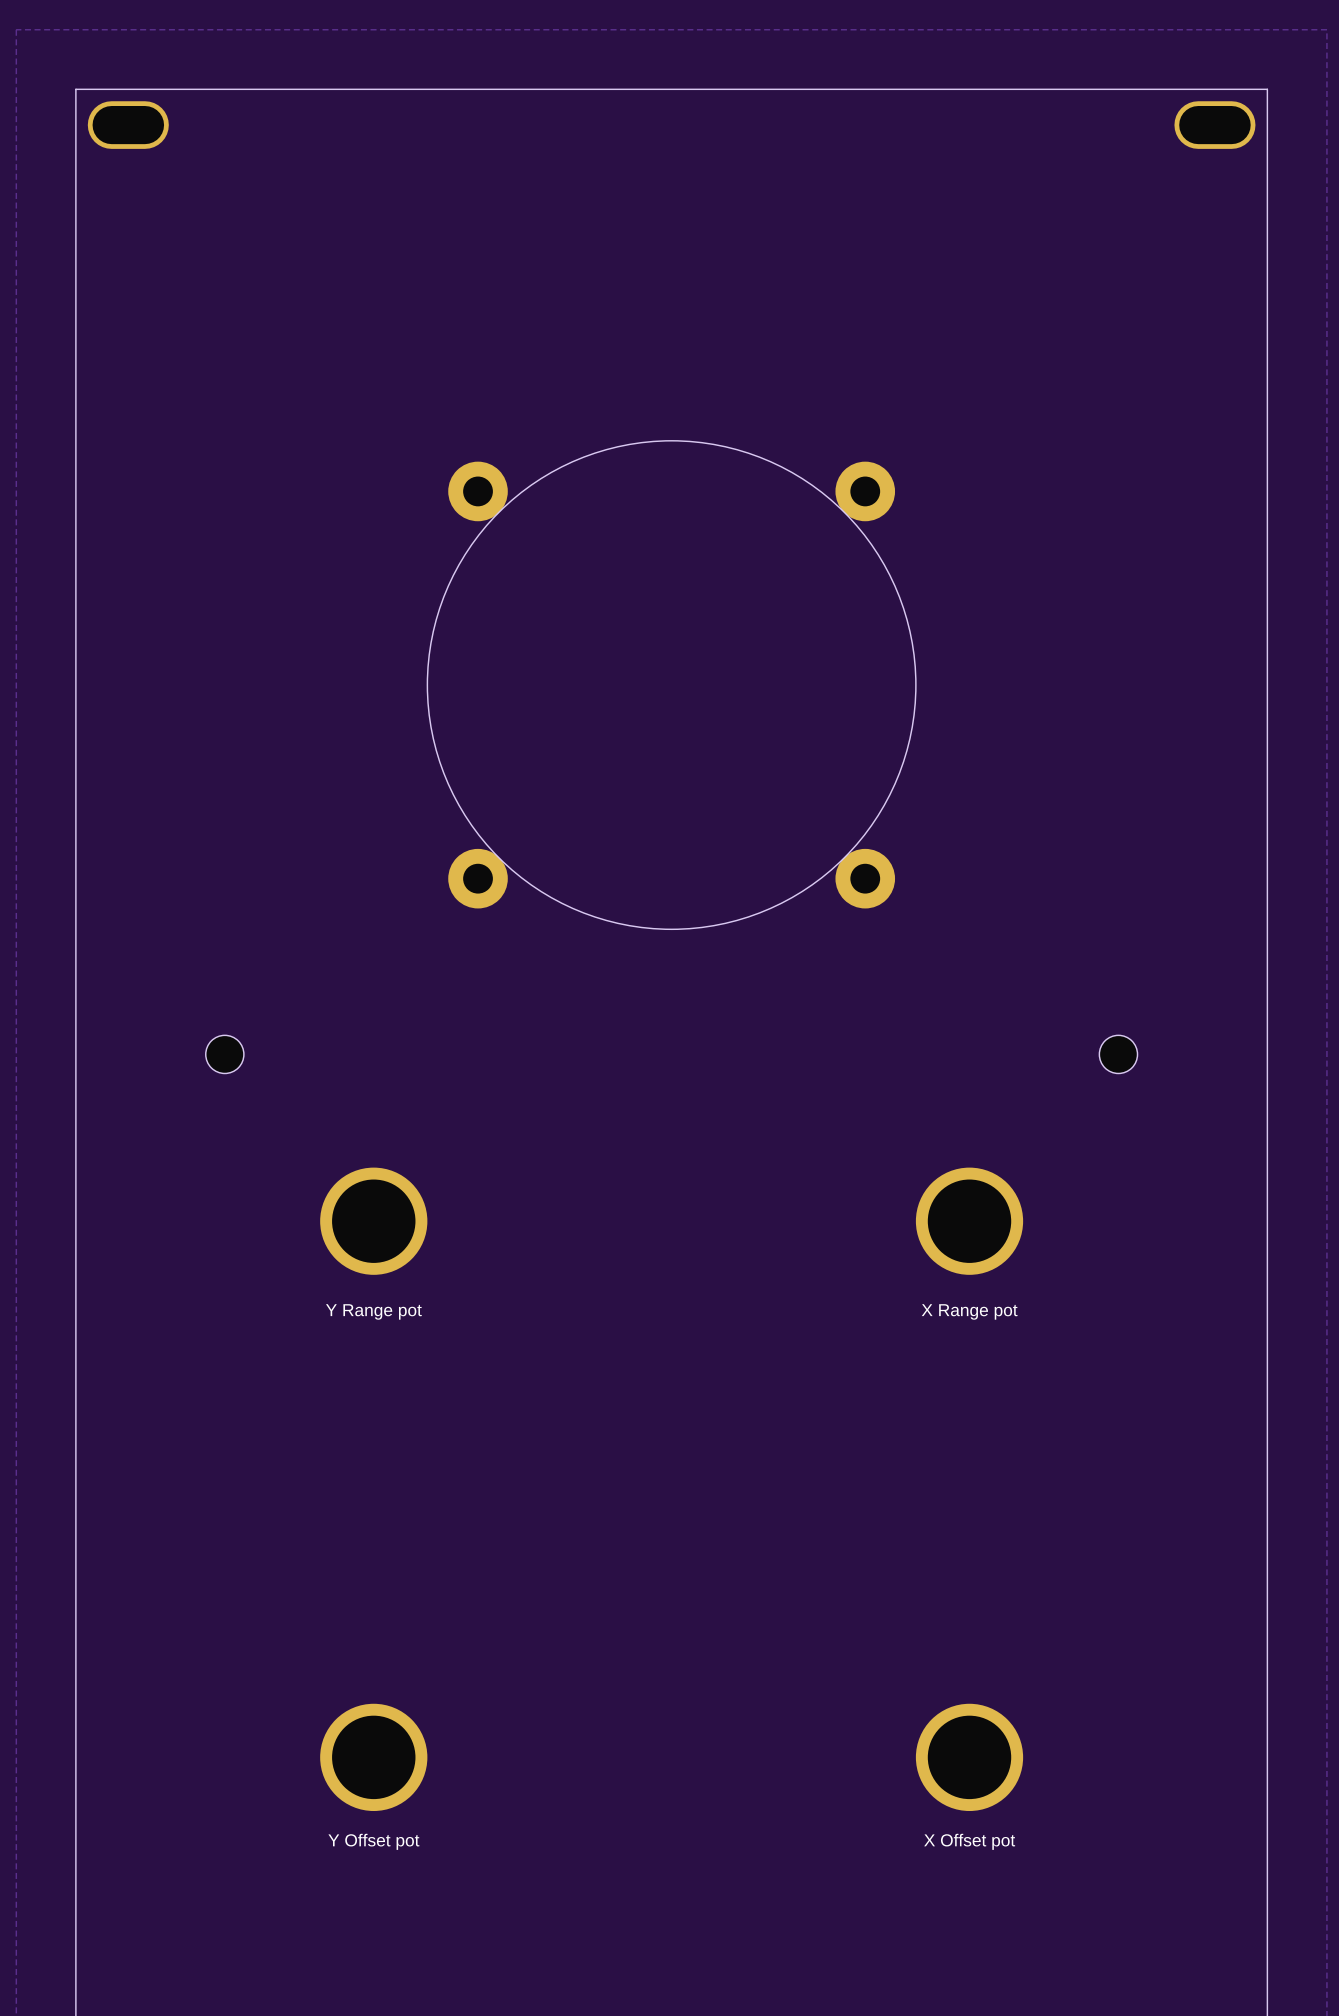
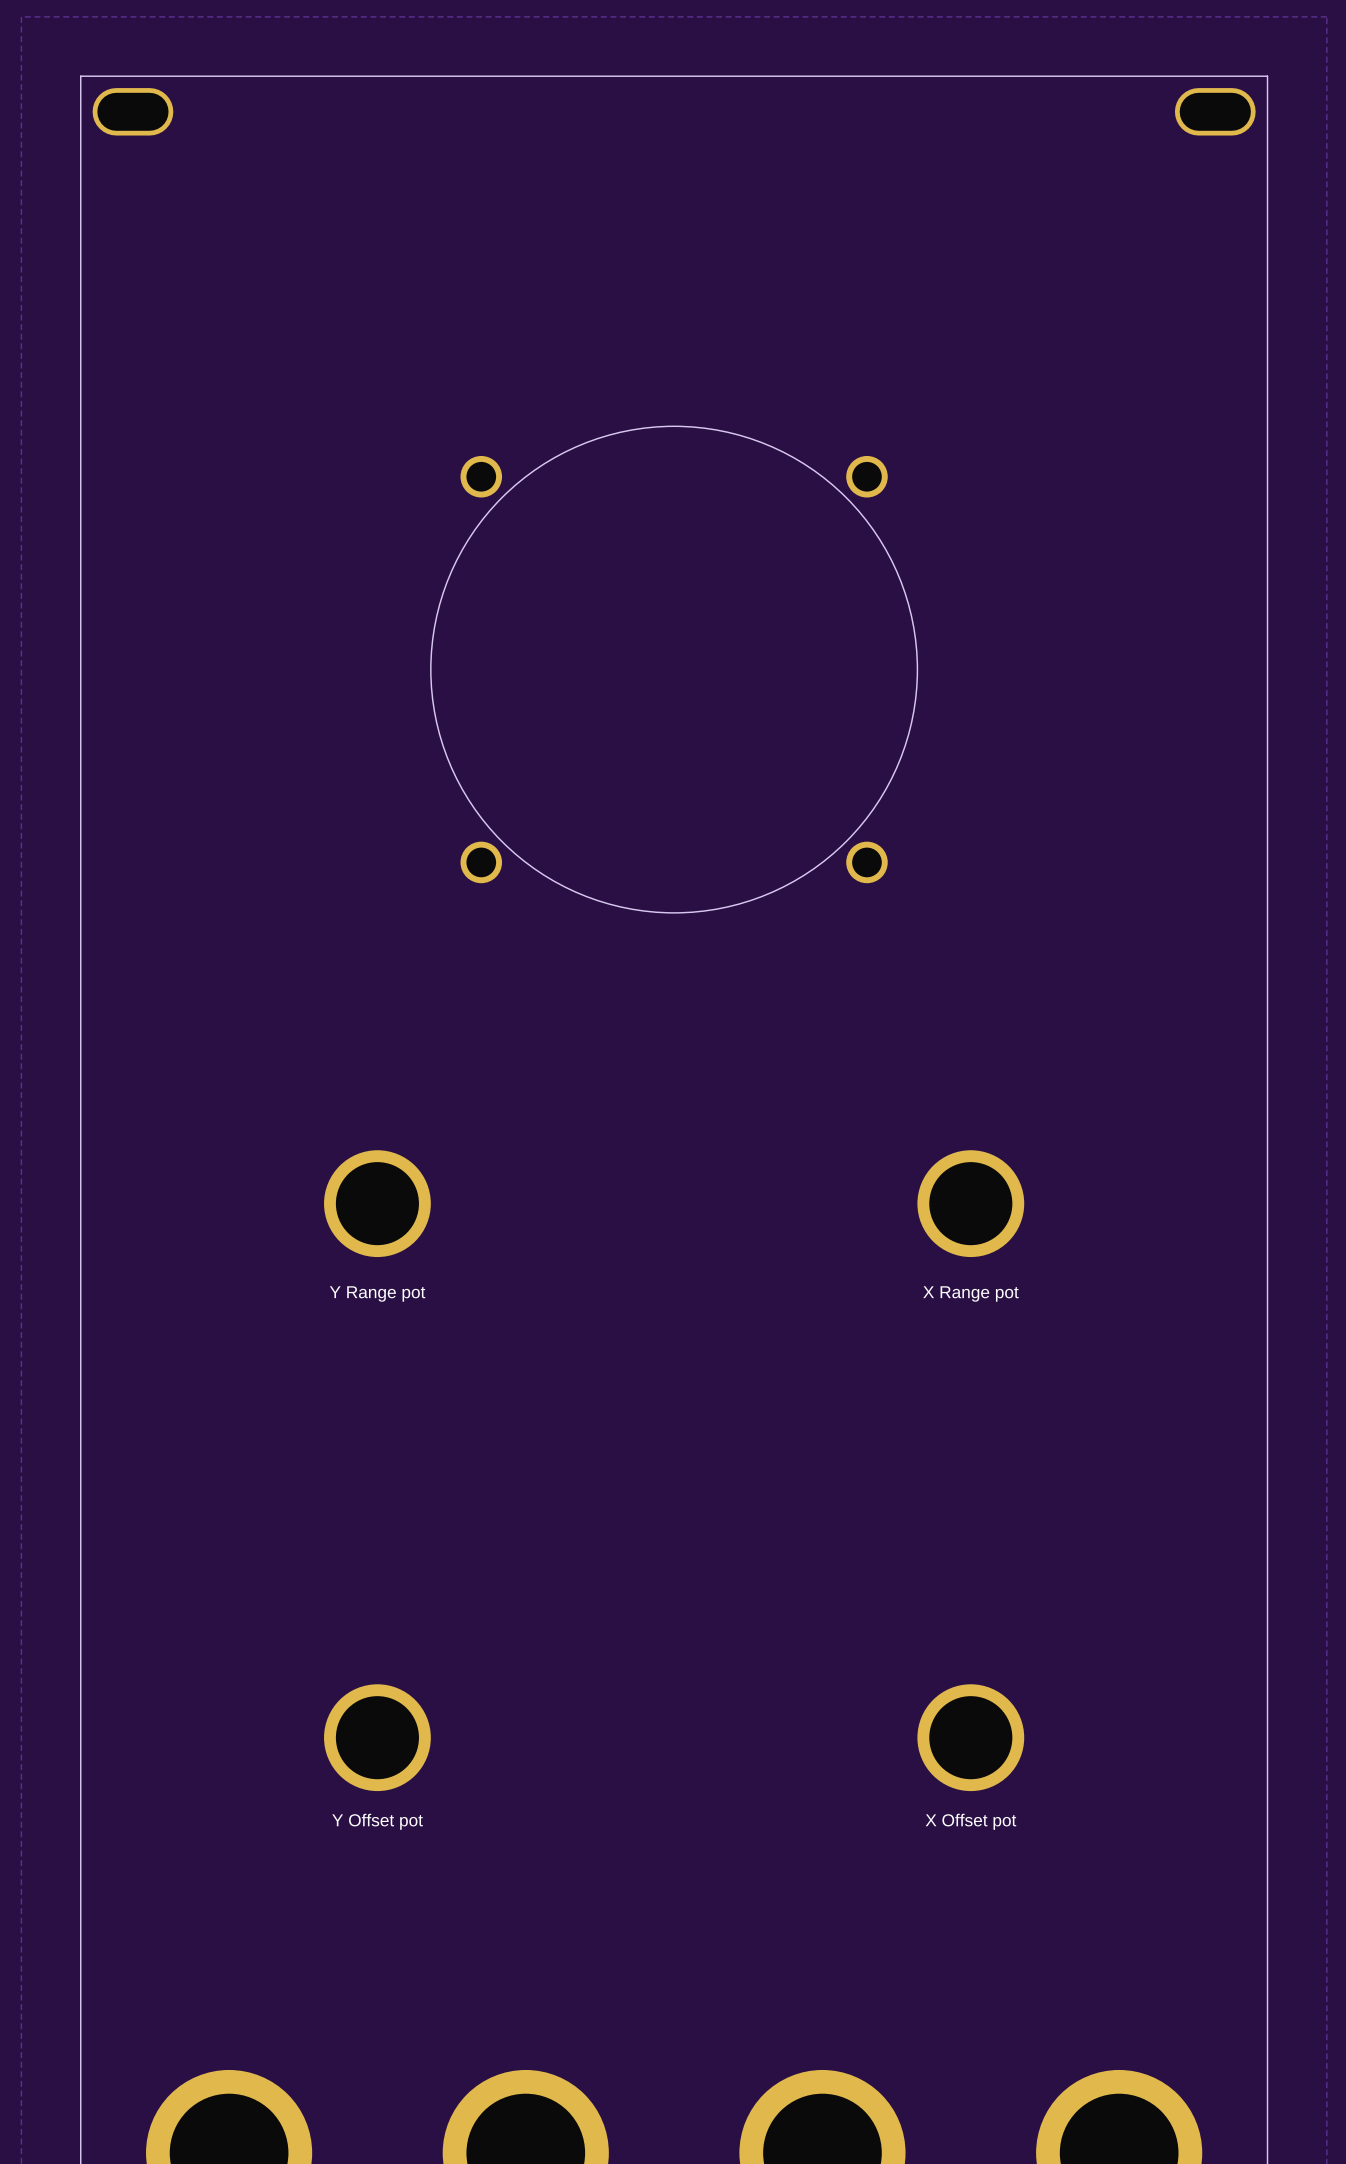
part footprint: [448, 461, 508, 522] -> [460, 455, 503, 498]
part footprint: [835, 461, 896, 522] -> [846, 455, 888, 498]
part footprint: [448, 848, 508, 909] -> [460, 841, 503, 884]
part footprint: [835, 848, 896, 909] -> [846, 841, 888, 884]
part: (224, 1054) -> none
part: (1118, 1054) -> none

